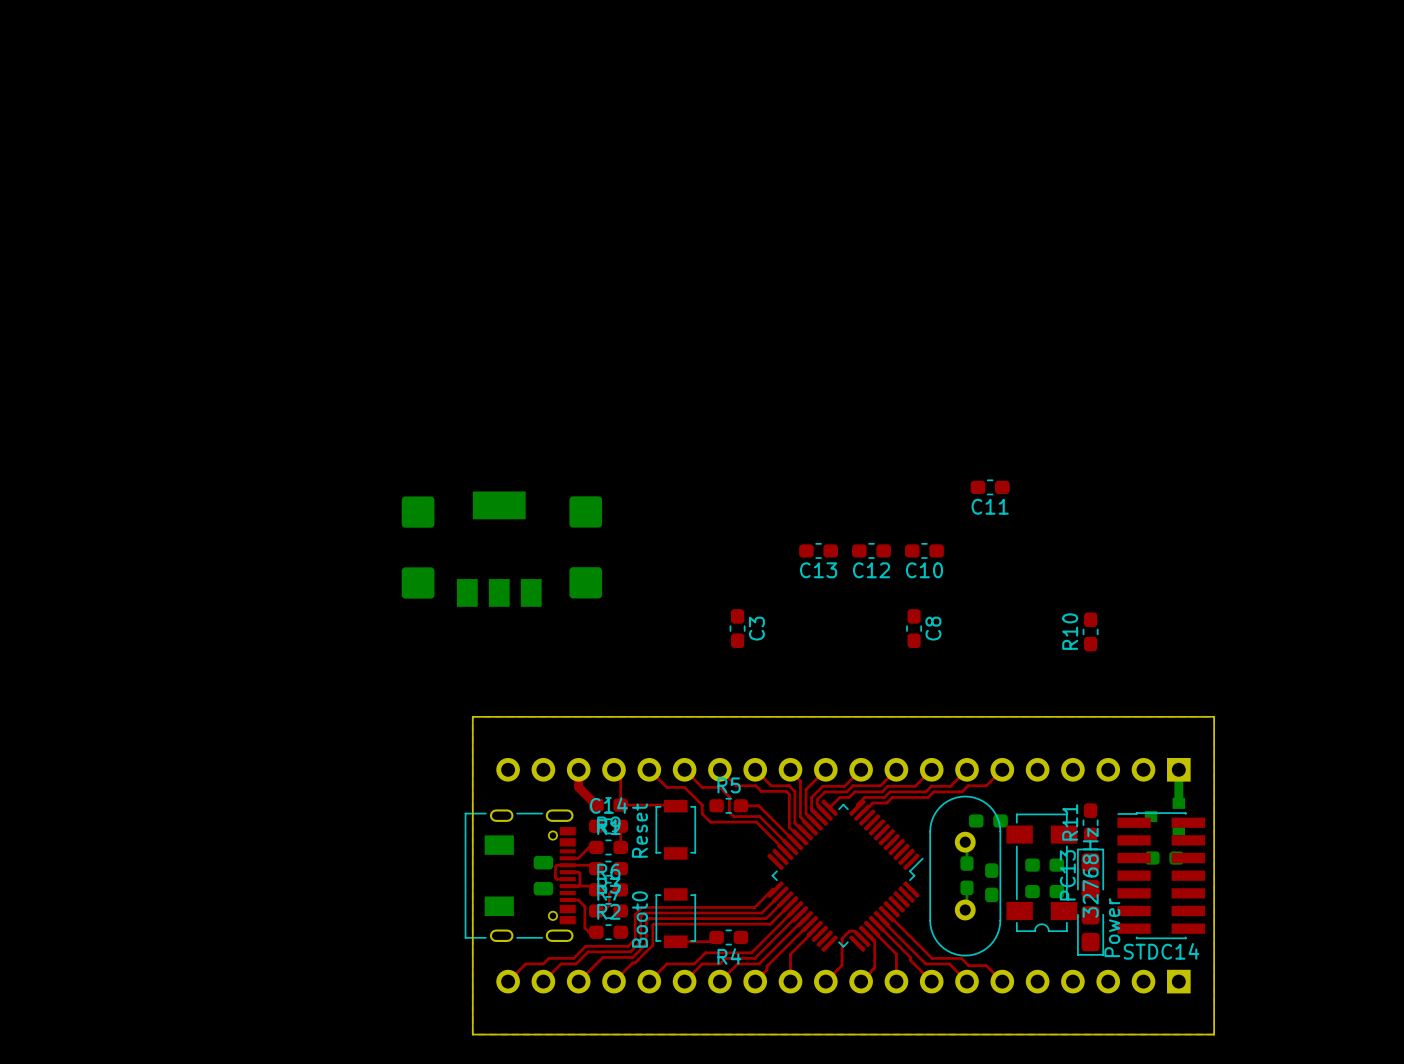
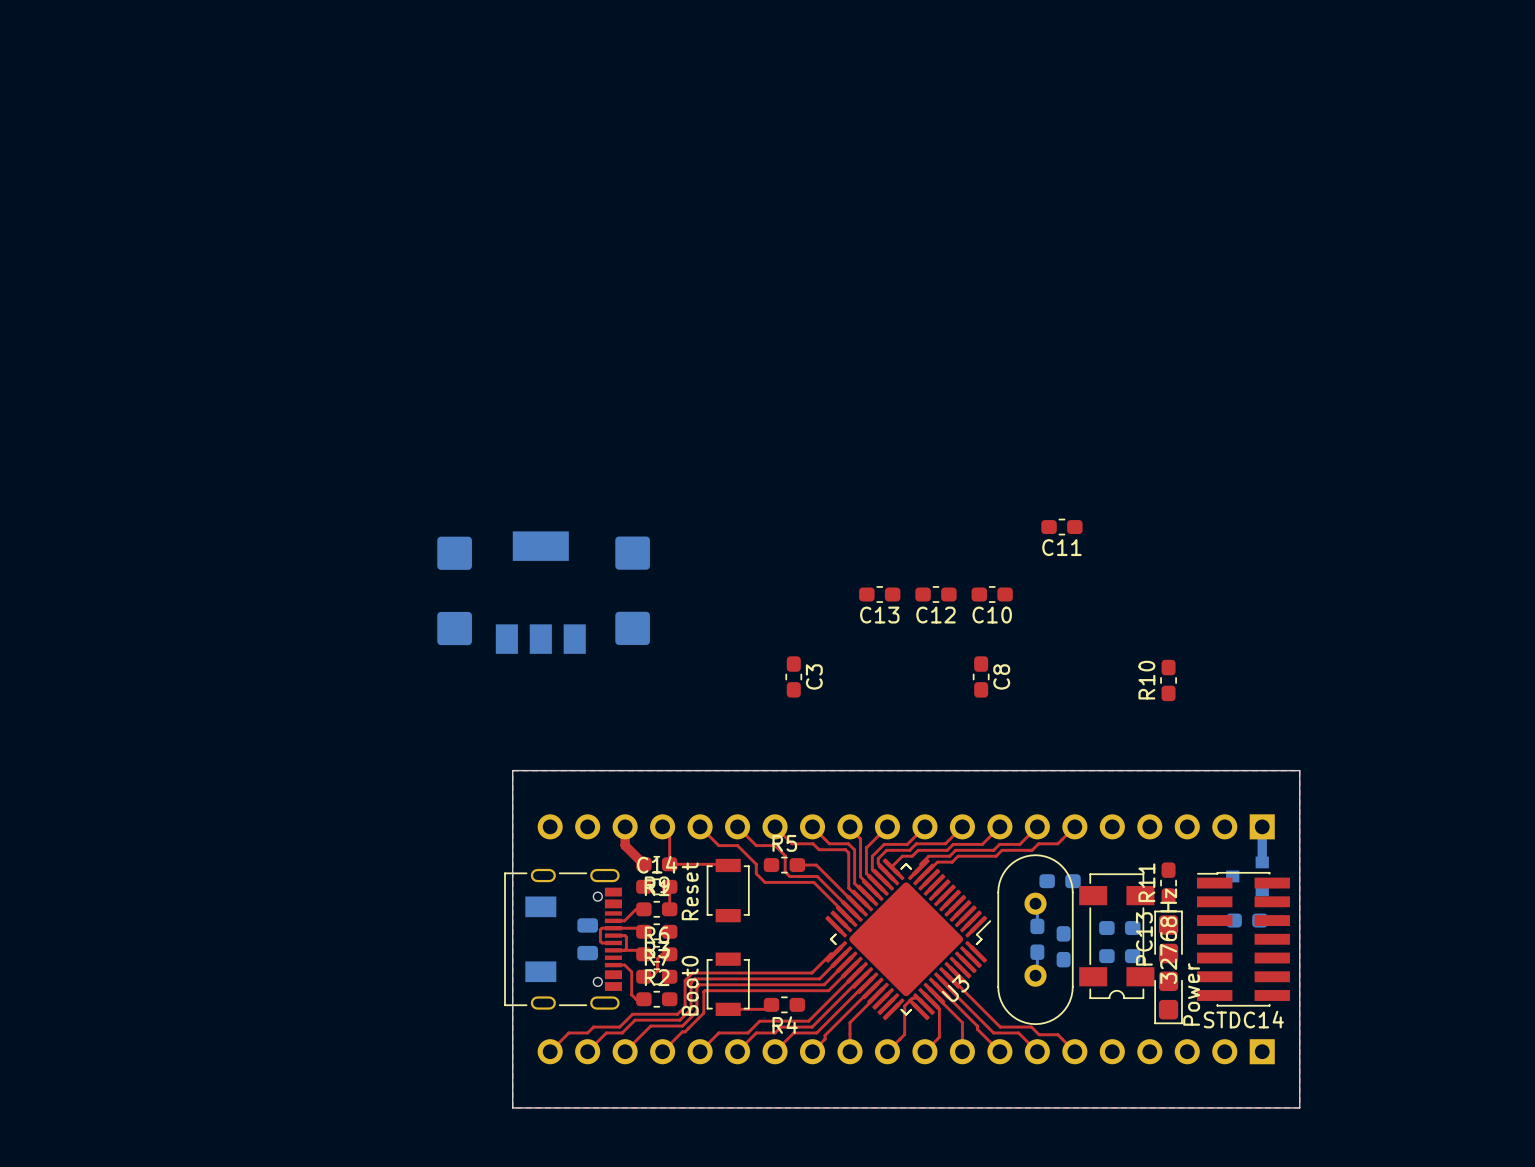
U3: none -> (906, 939)

